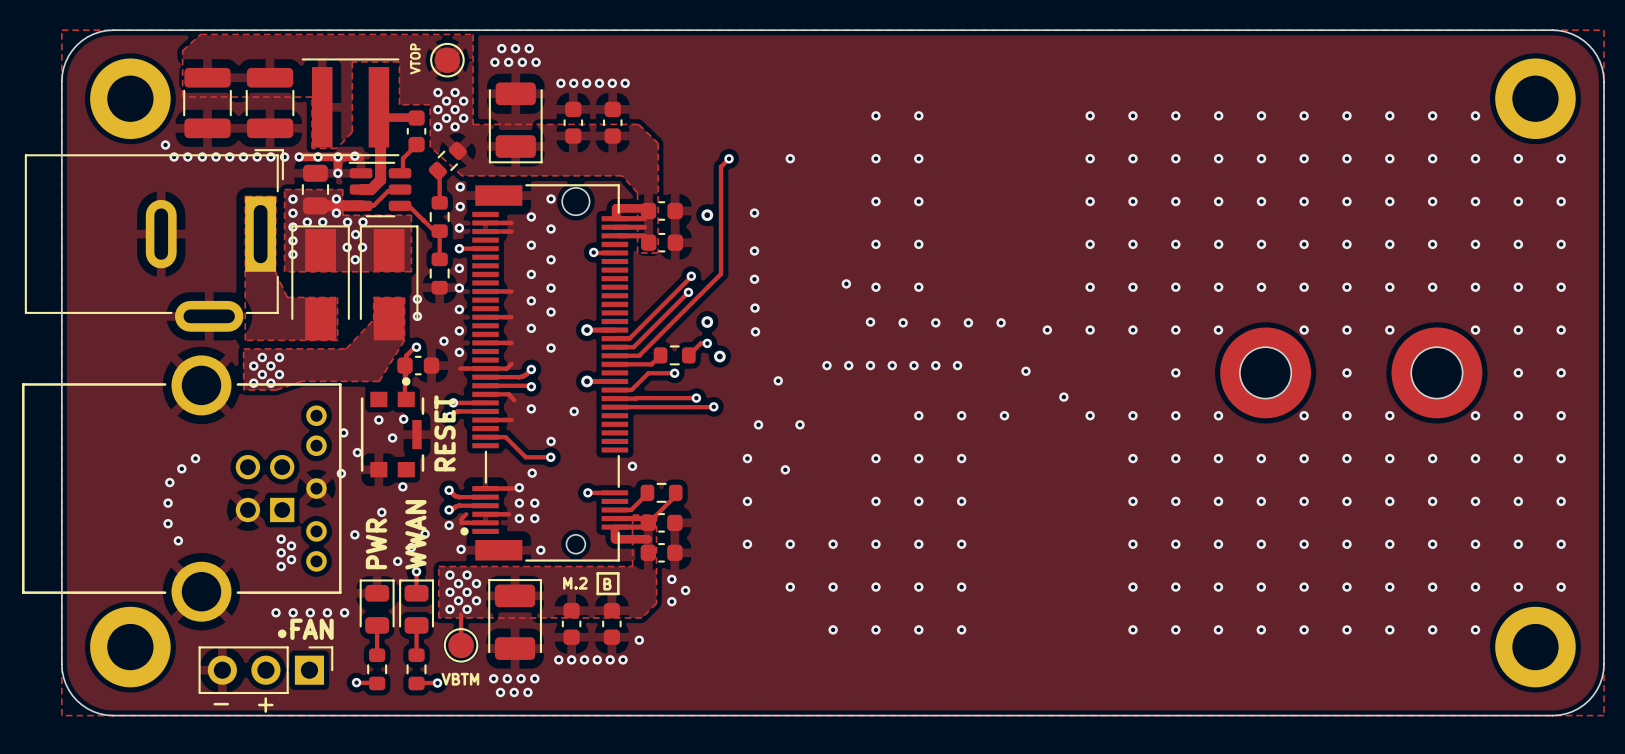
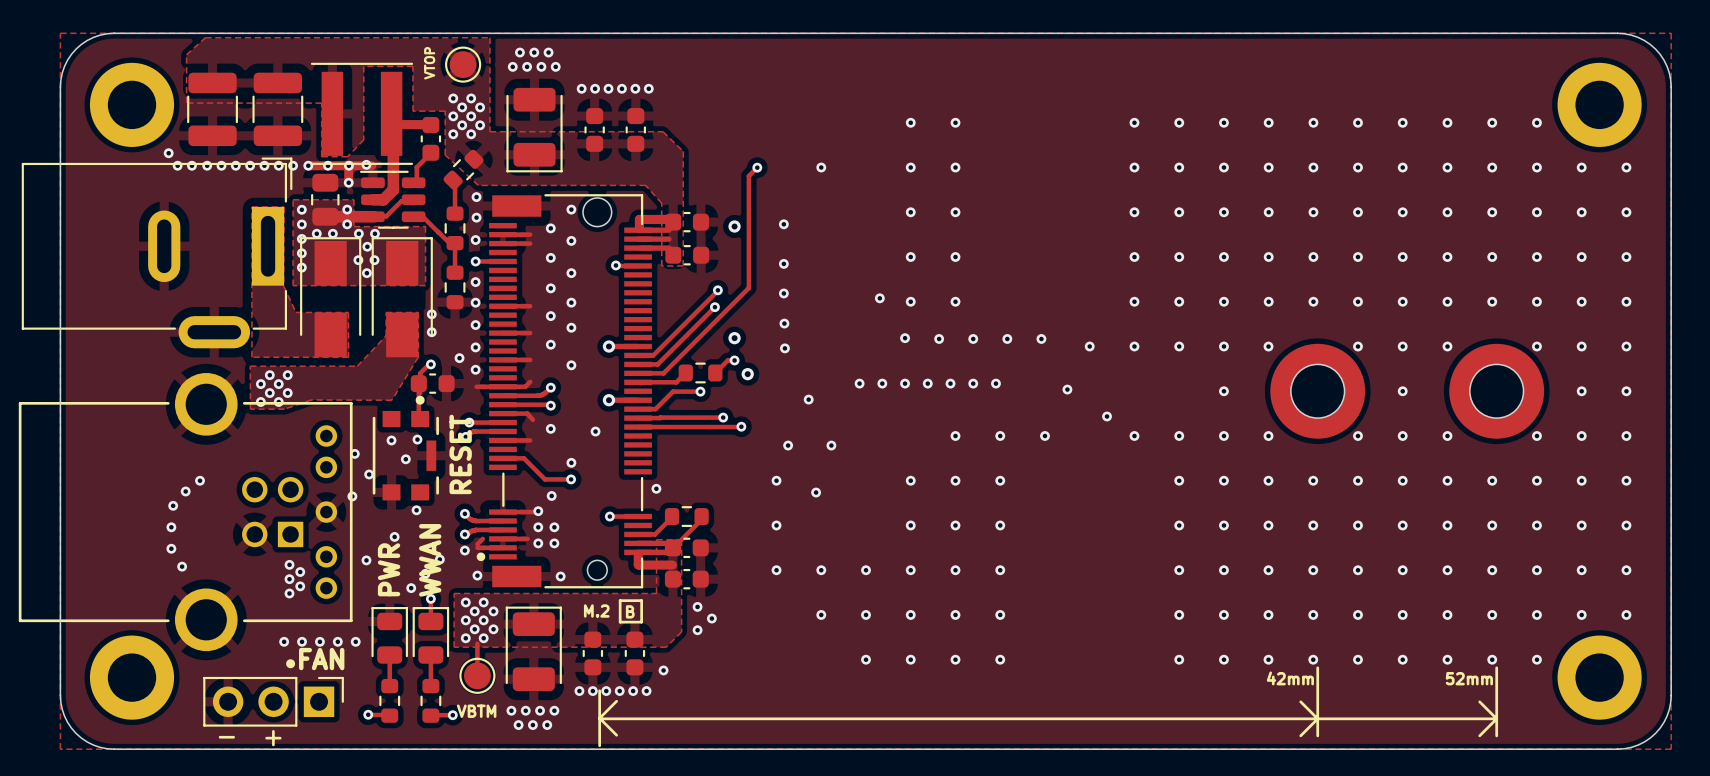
line: none -> (1317, 667) (1317, 735)
line: none -> (1496, 667) (1496, 735)
text: none -> 42mm (1290, 678)
text: none -> 52mm (1469, 678)
line: none -> (599, 690) (599, 745)
line: none -> (616, 701) (599, 718) (616, 735)
line: none -> (1300, 701) (1317, 718) (1300, 735)
line: none -> (1479, 701) (1496, 718) (1479, 735)
line: none -> (599, 718) (1496, 718)

